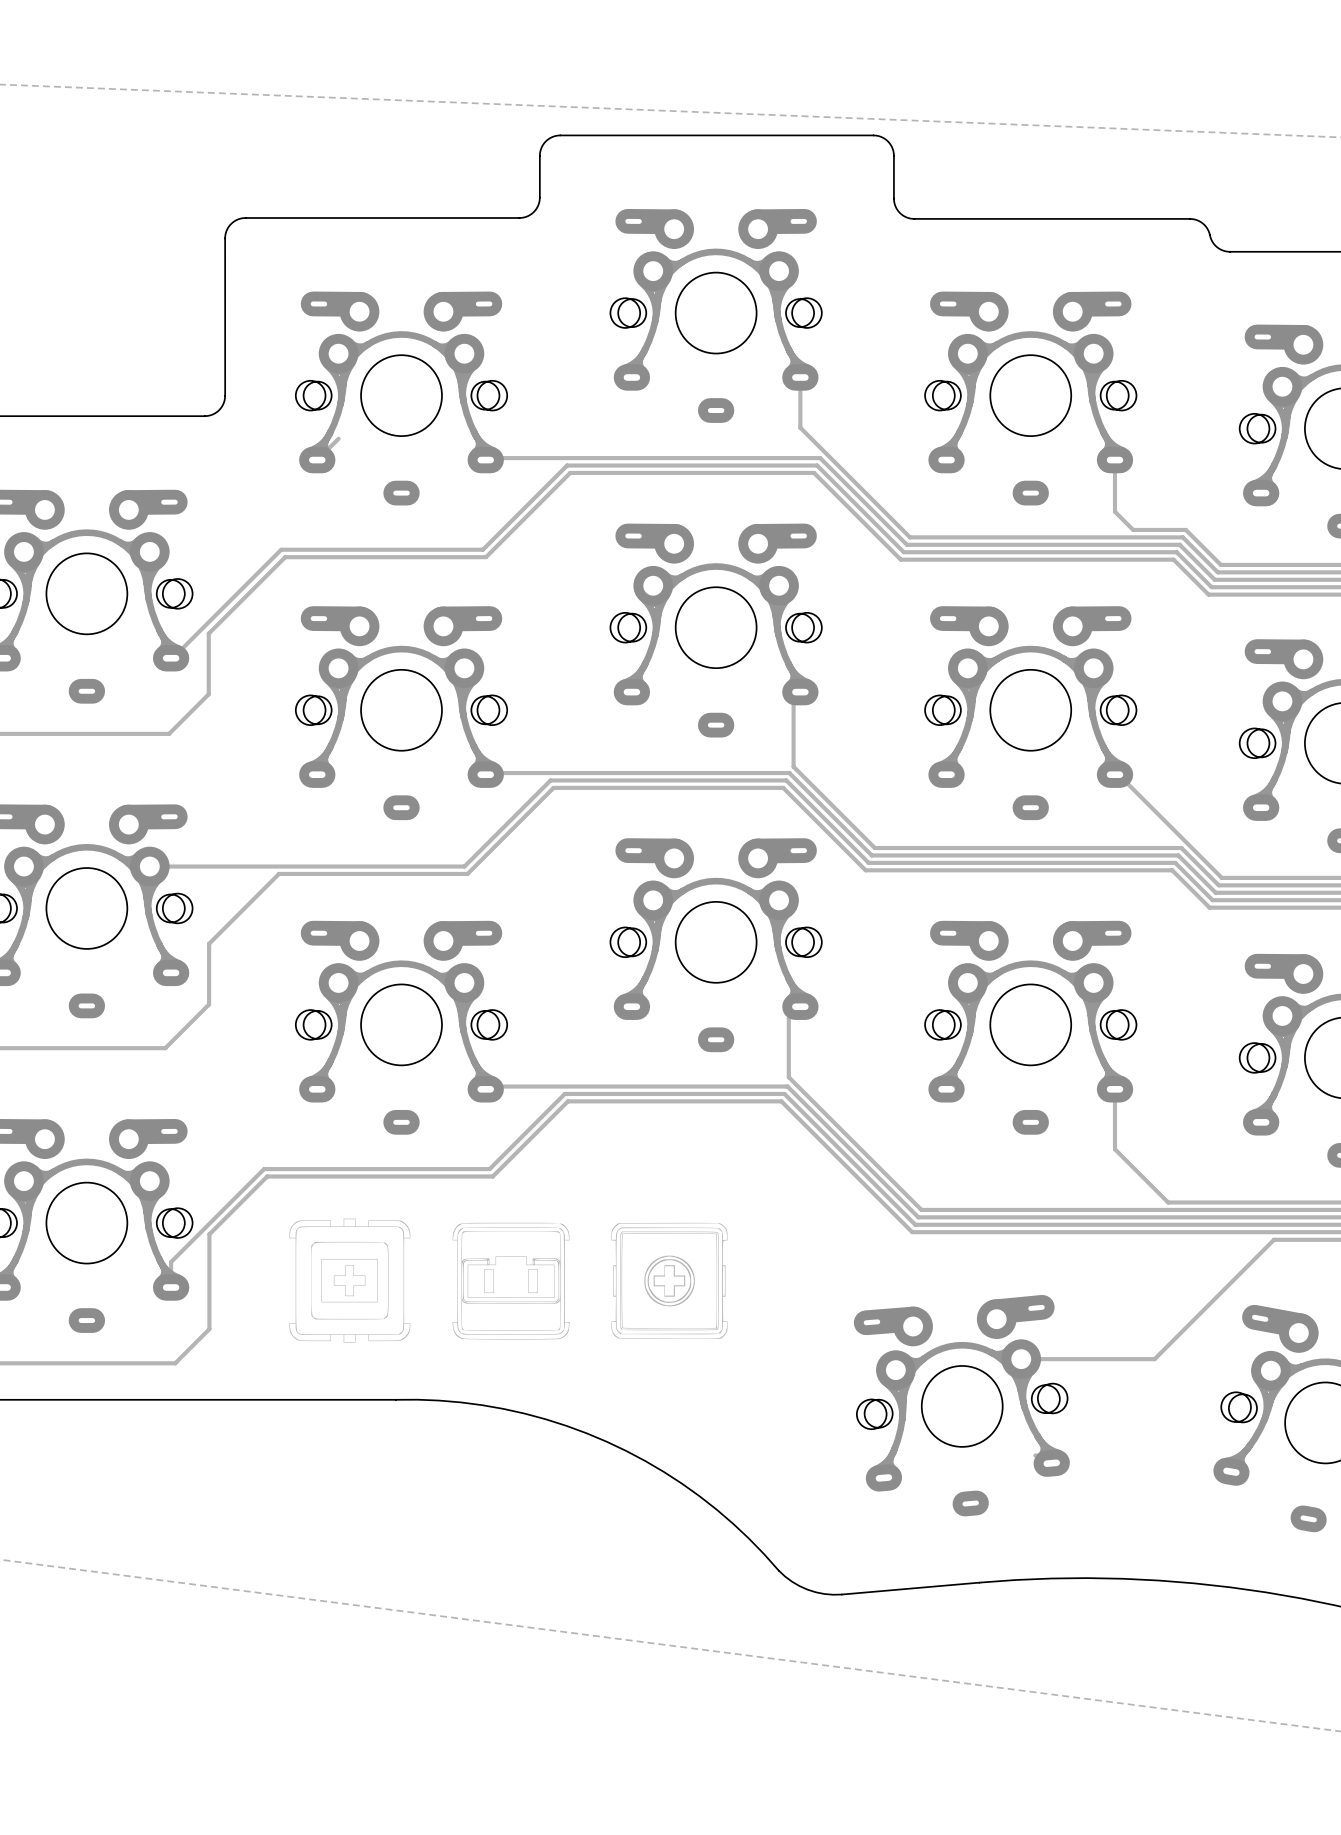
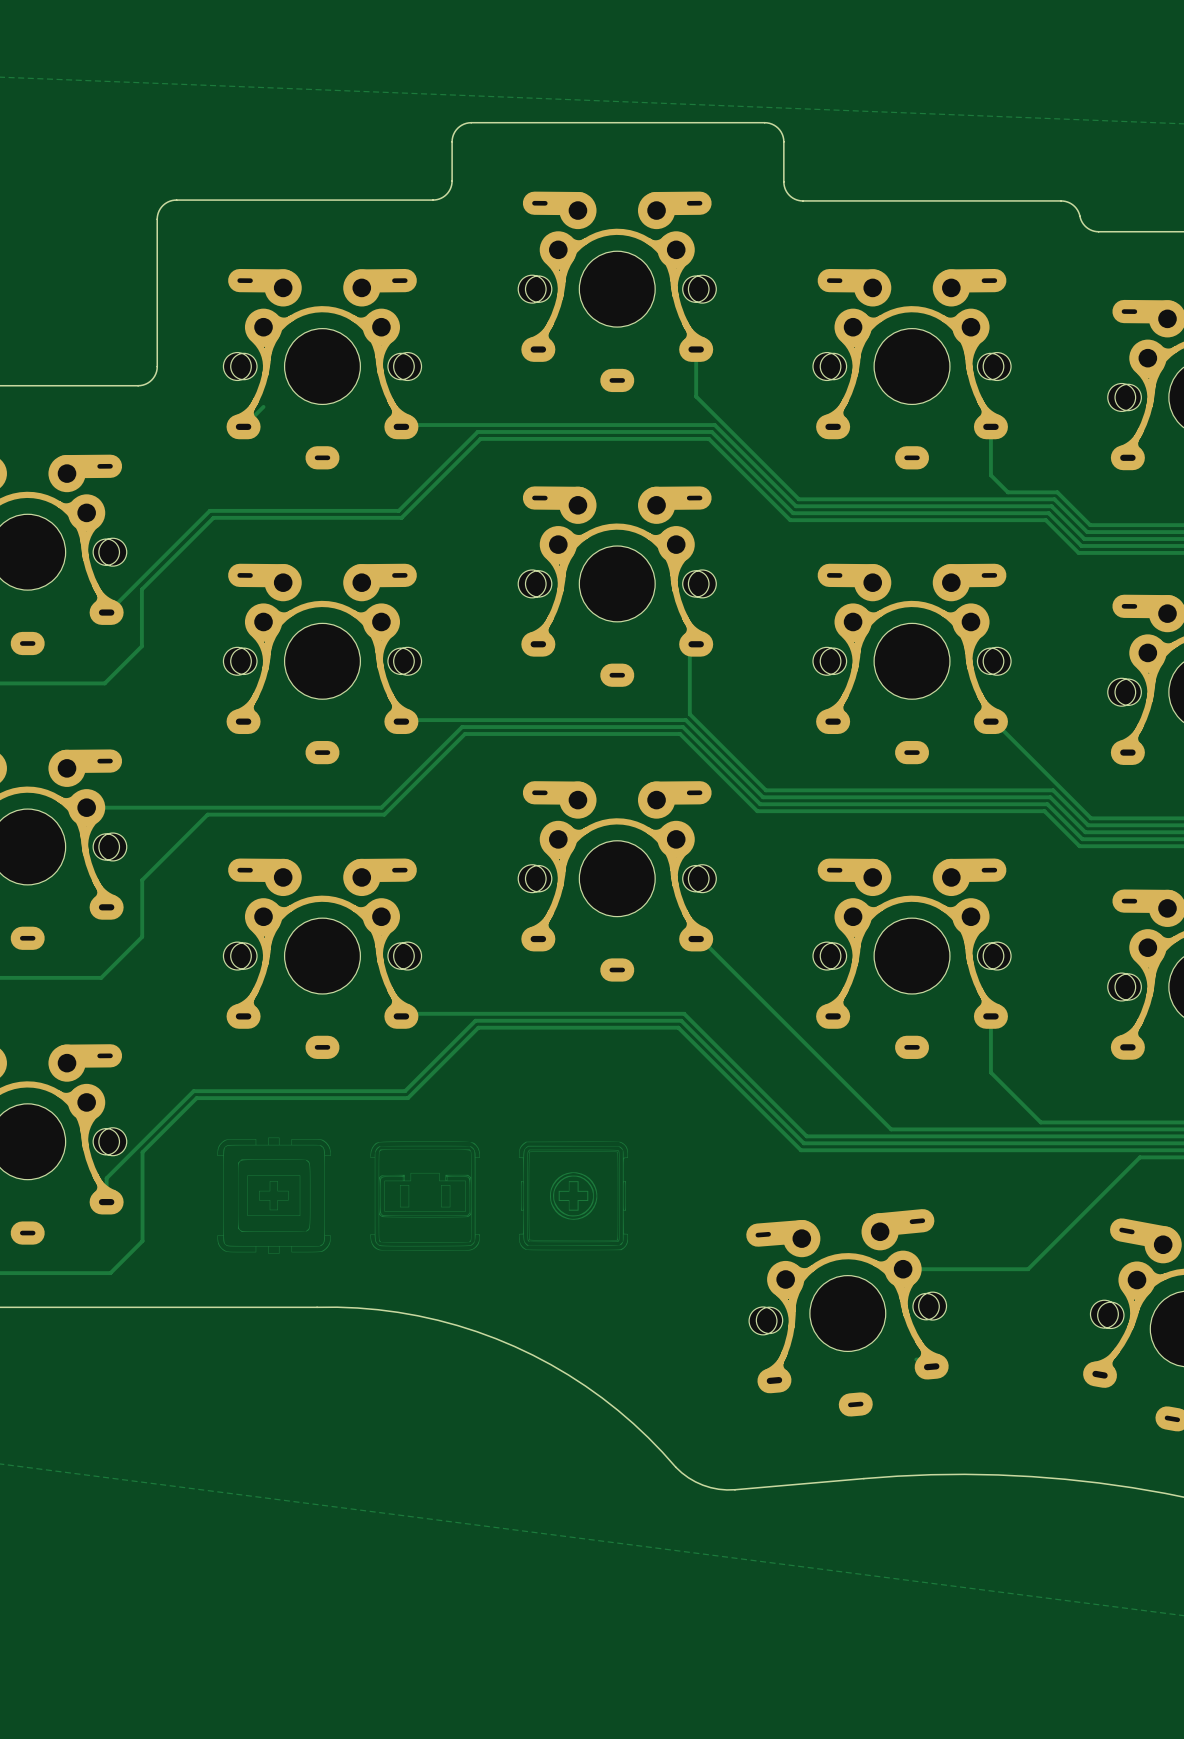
track: (800, 1006) (788, 1018) (788, 1077) (921, 1209) (1008, 1209) -> (696, 939) (700, 939) (891, 1129)

